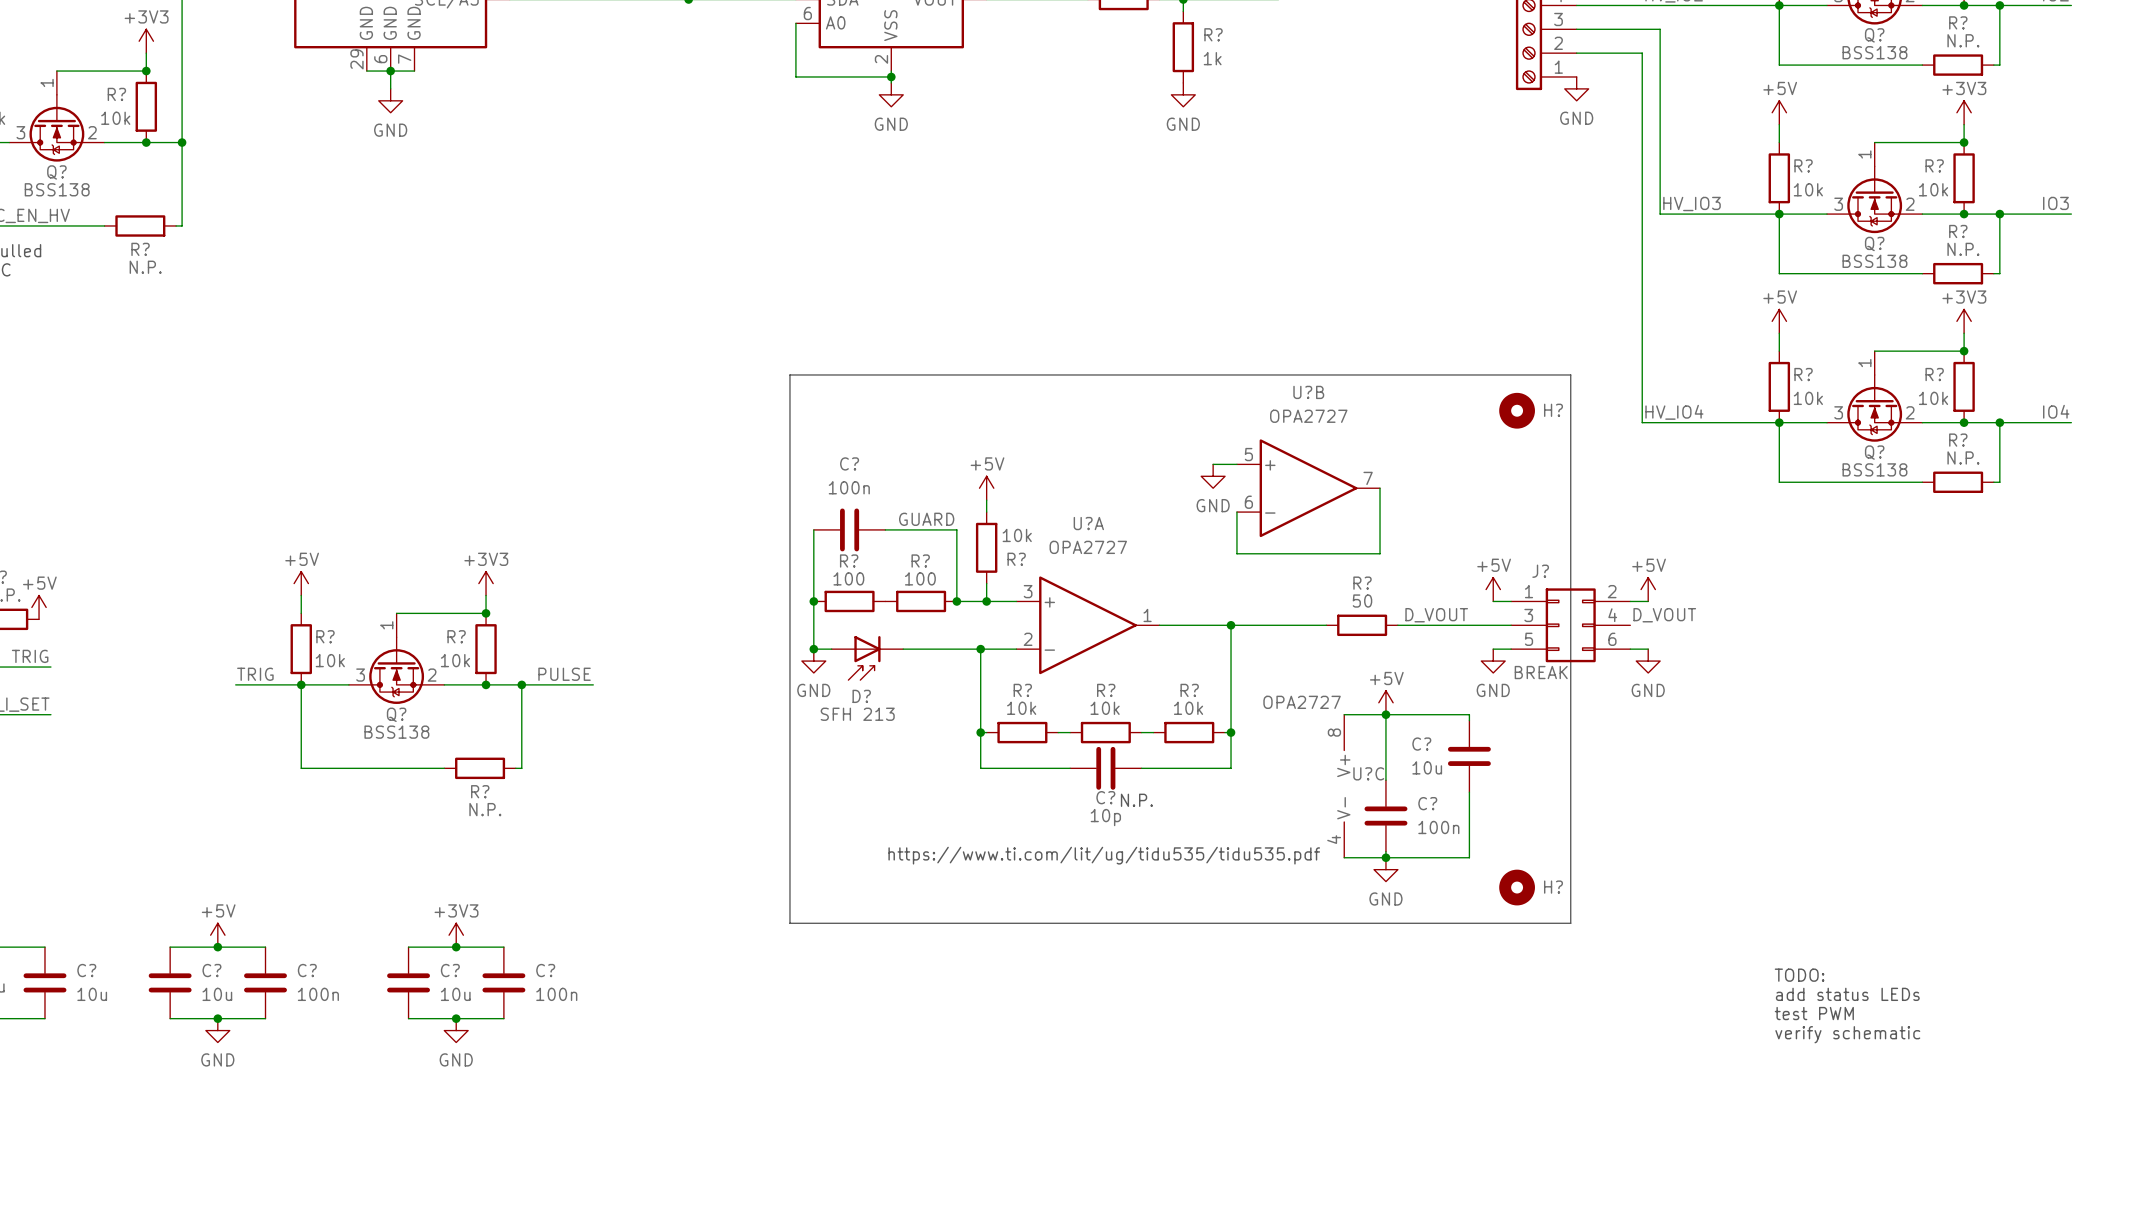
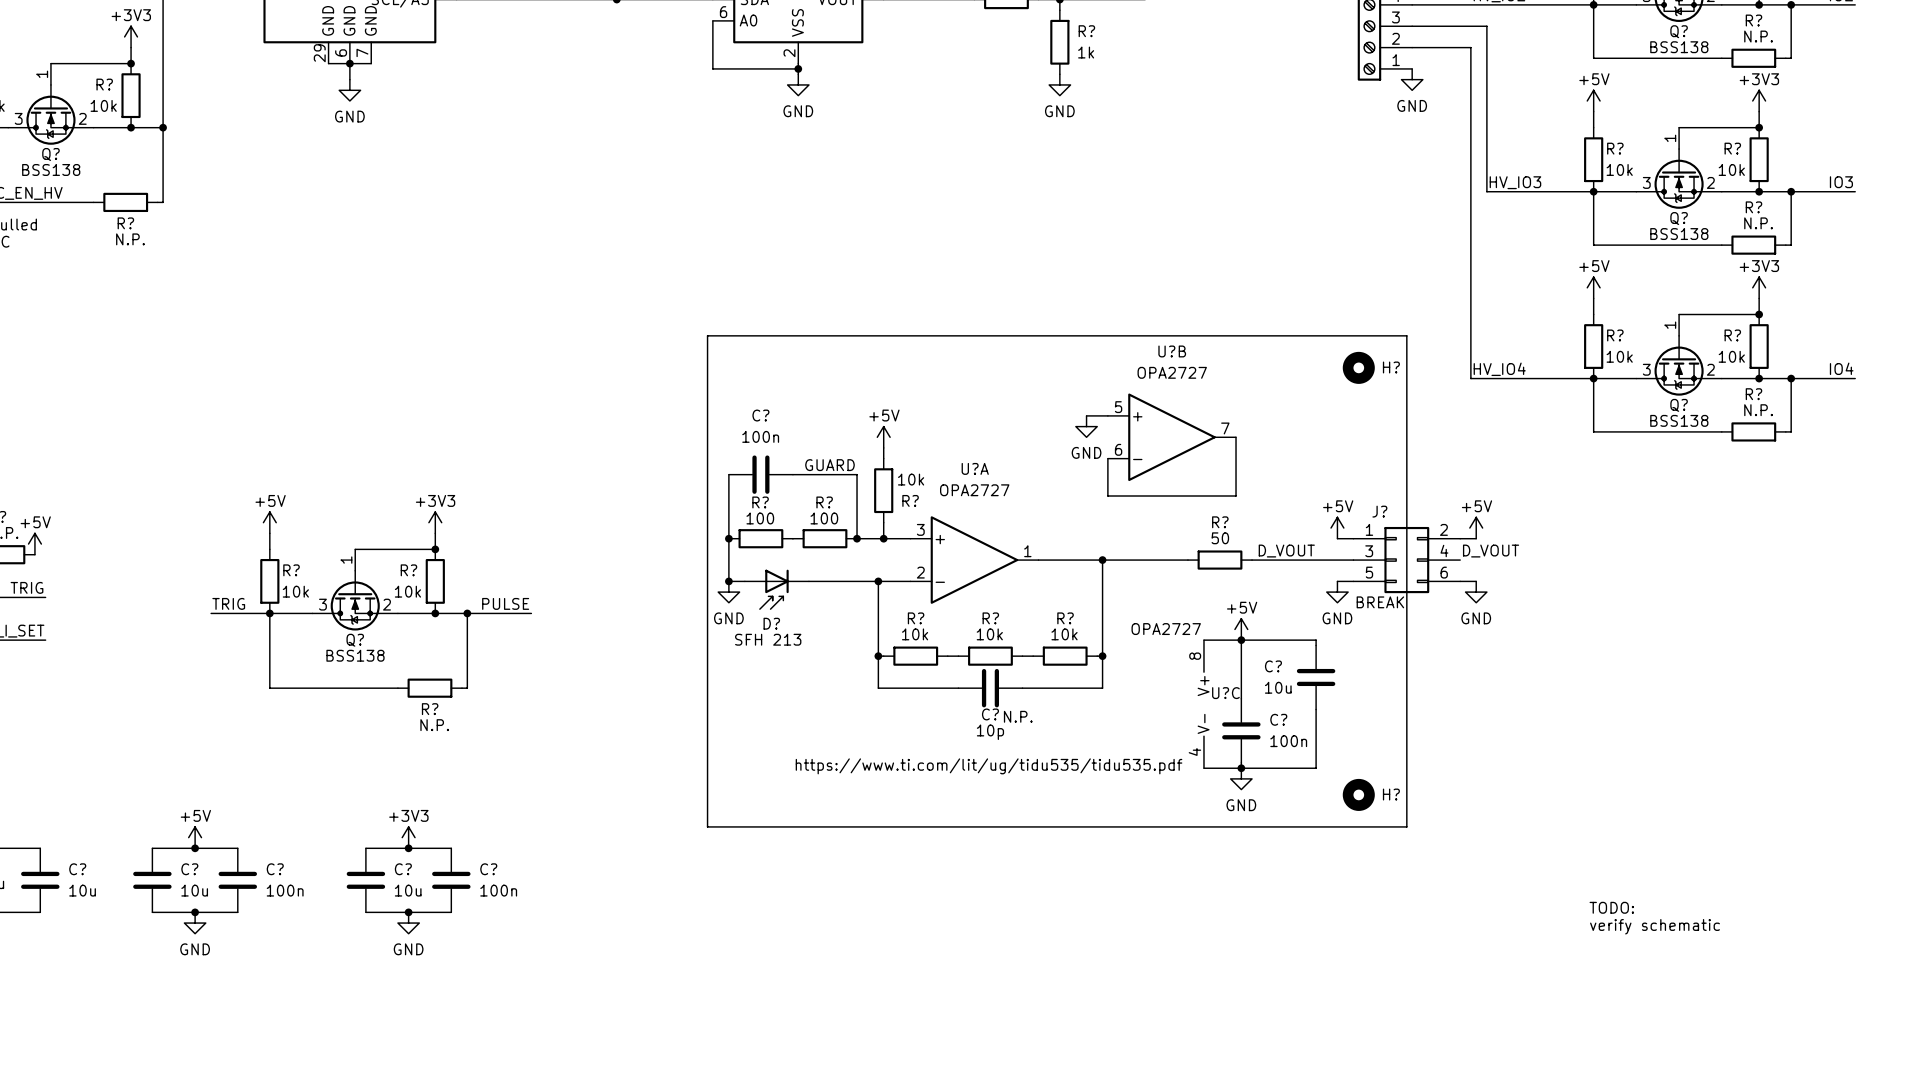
text: TODO: (1799, 975) -> none
text: add status LEDs (1847, 994) -> none
text: test PWM (1814, 1013) -> TODO: (1611, 907)

